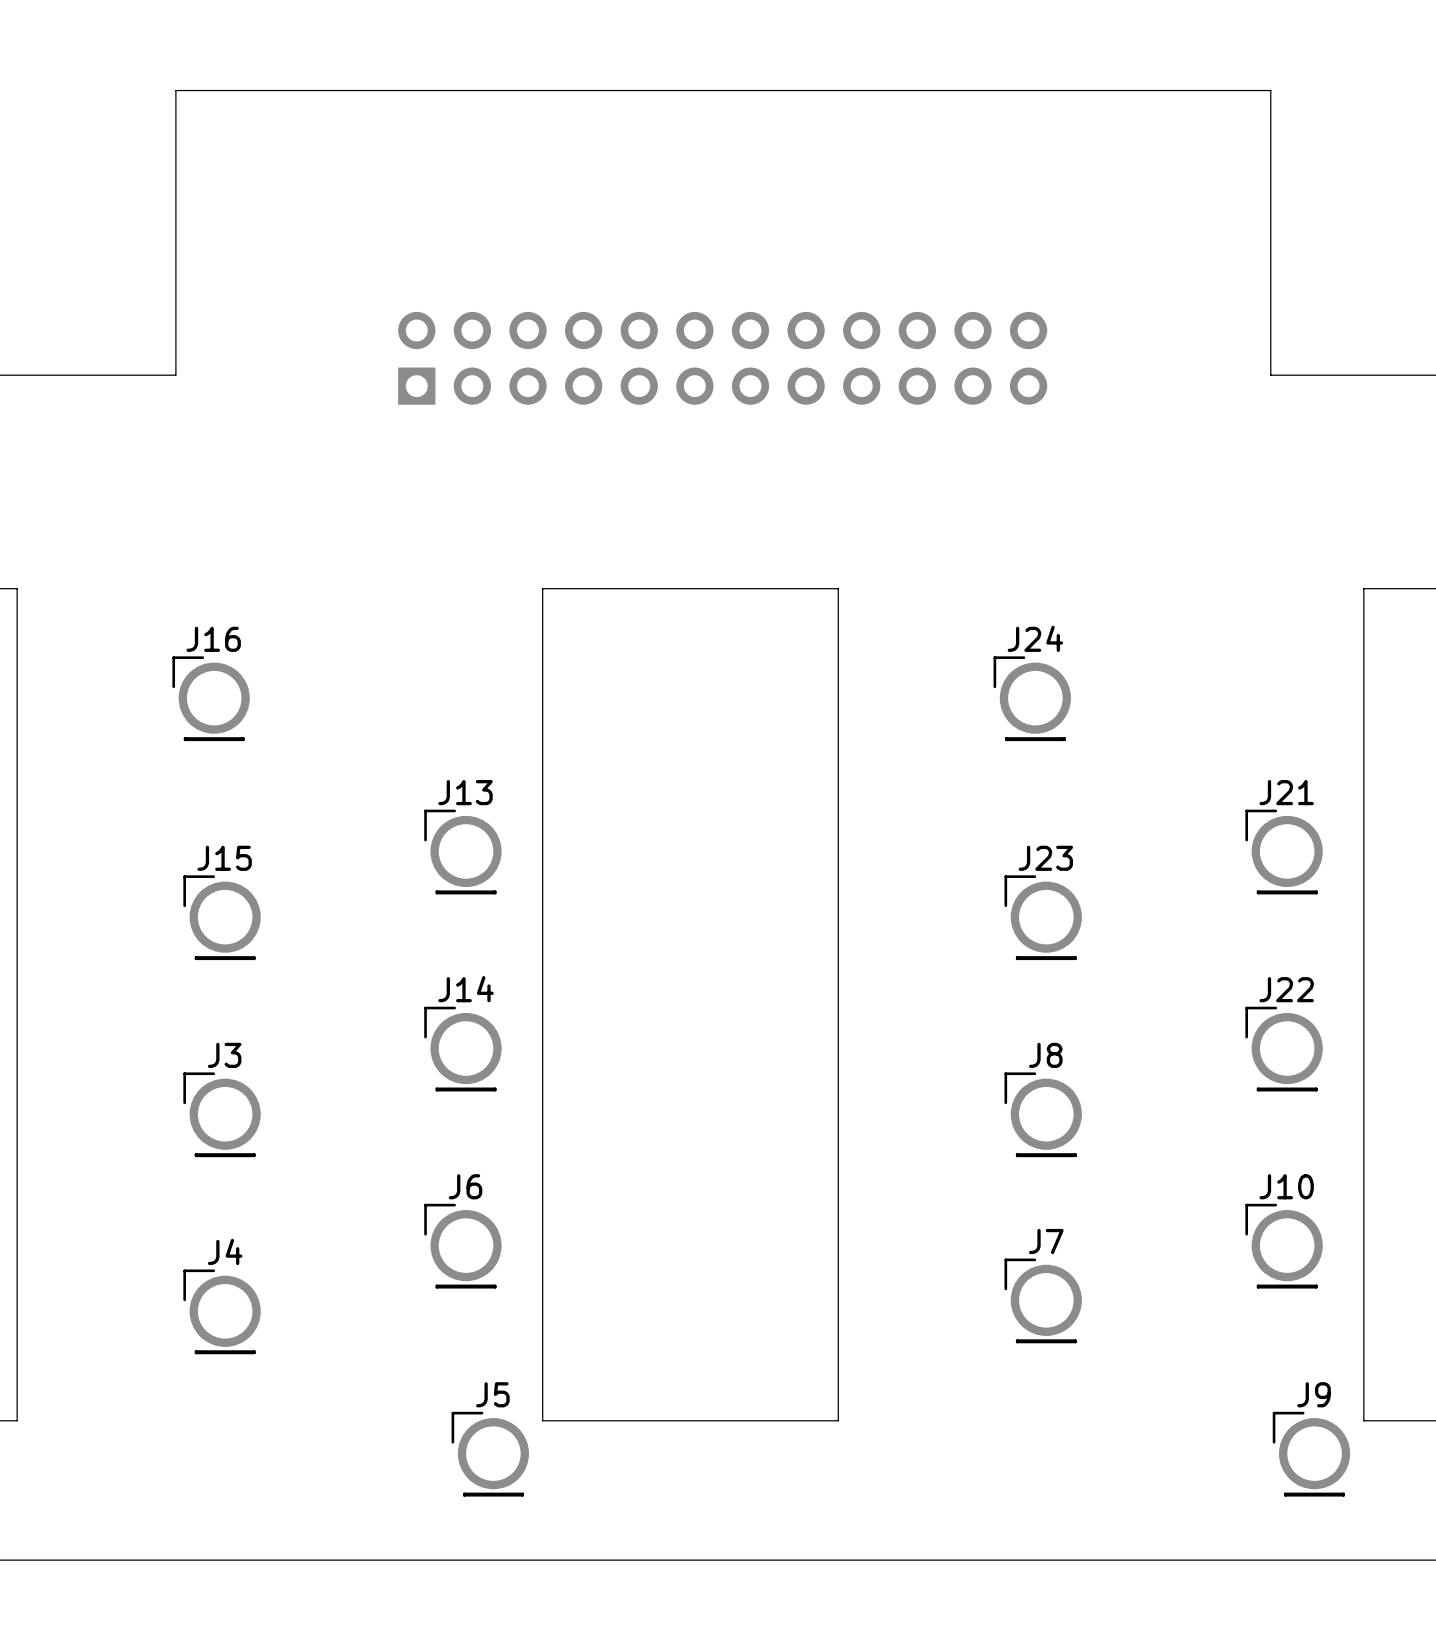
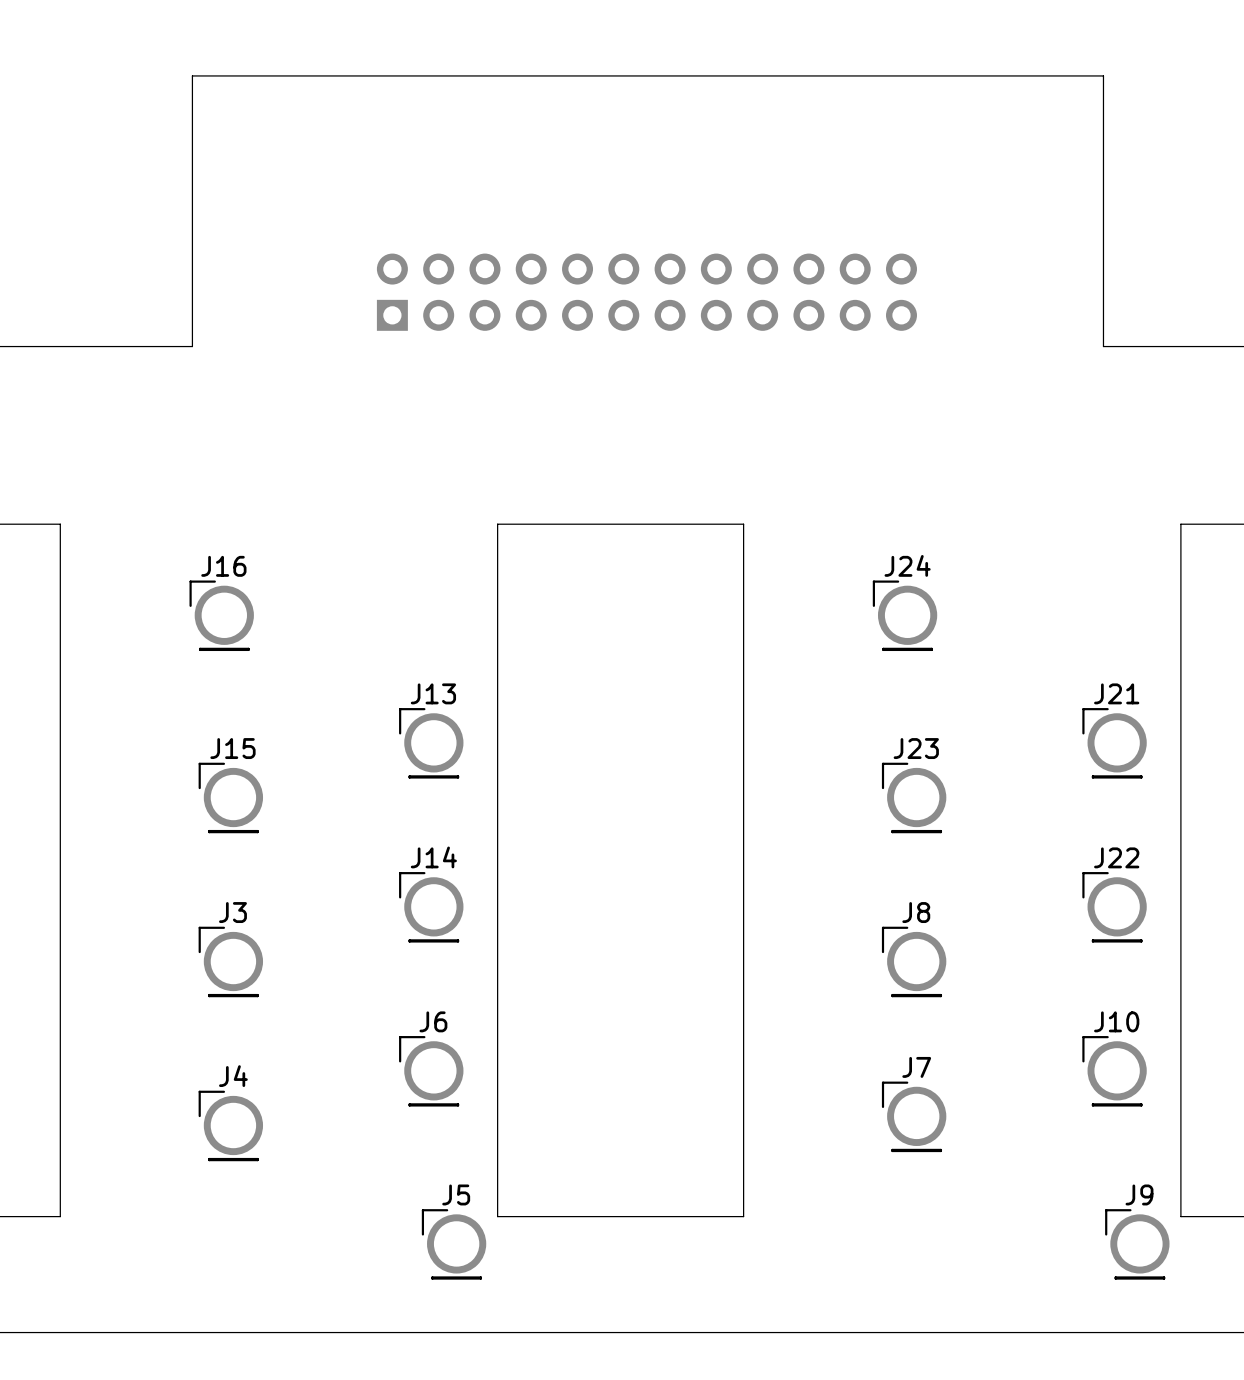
board edge: (175, 90) (1270, 90) -> (192, 109) (192, 75) (1103, 75) (1103, 109)
part position: (722, 358) -> (646, 292)

